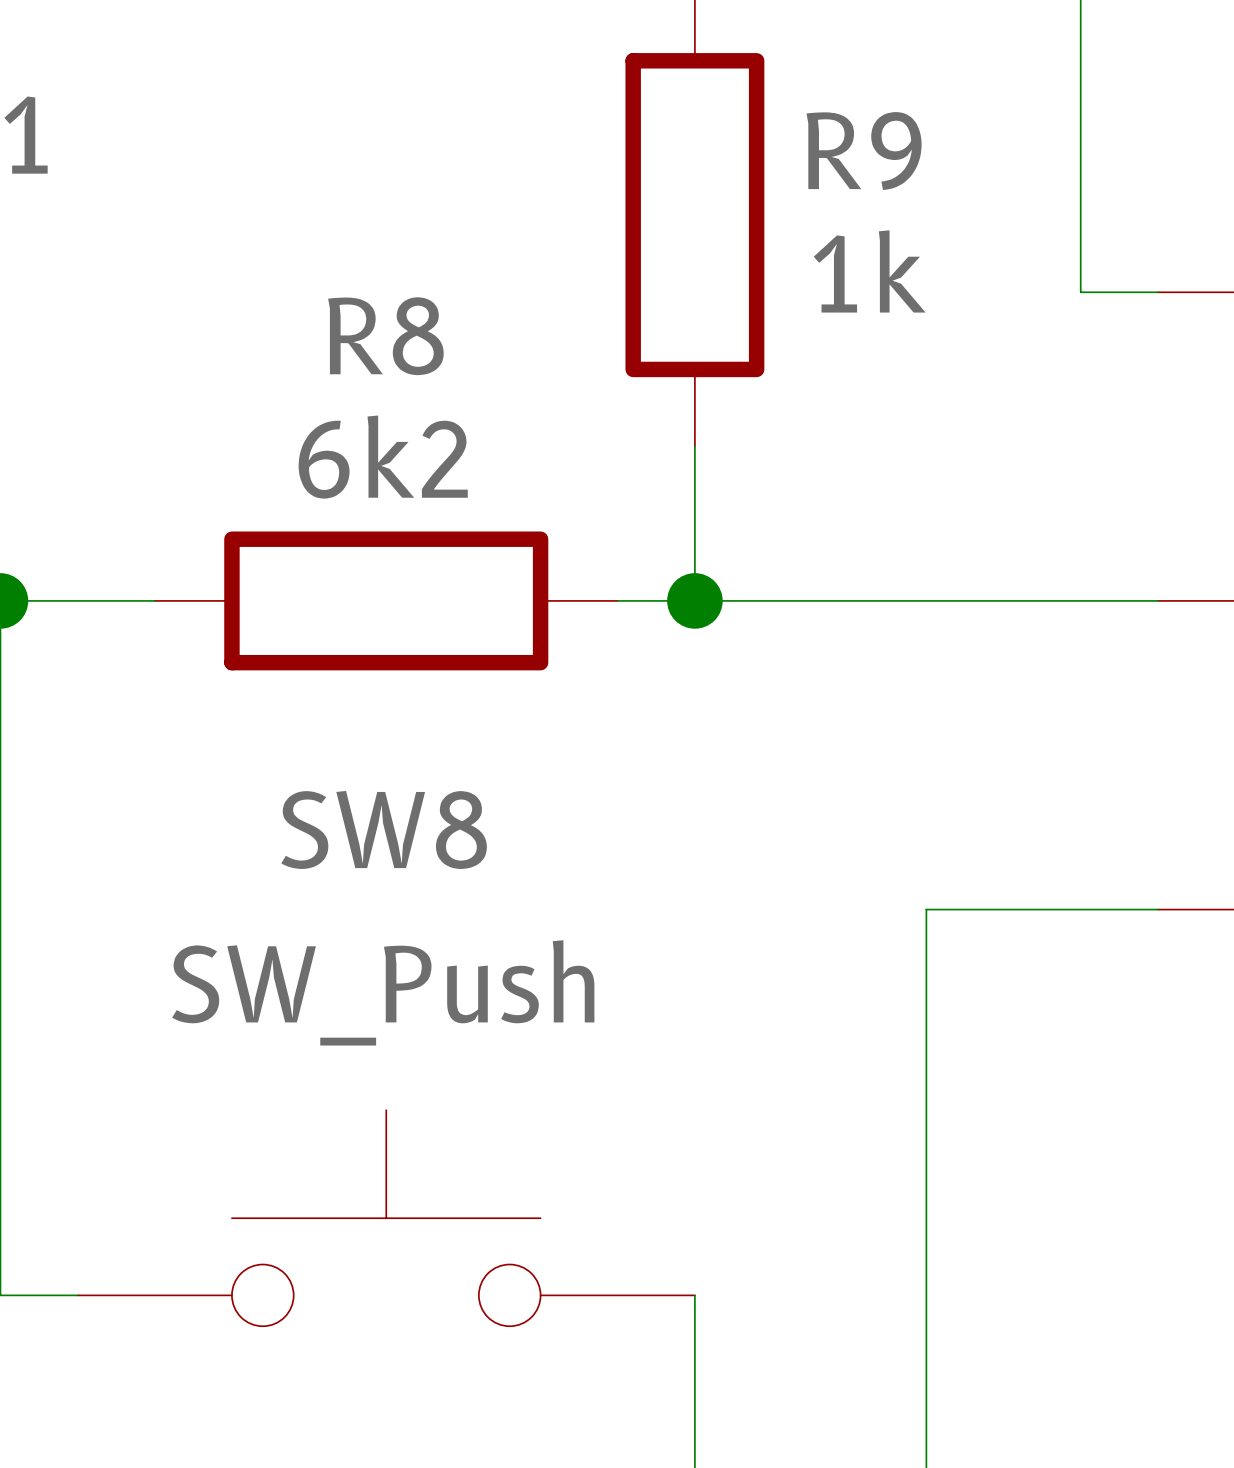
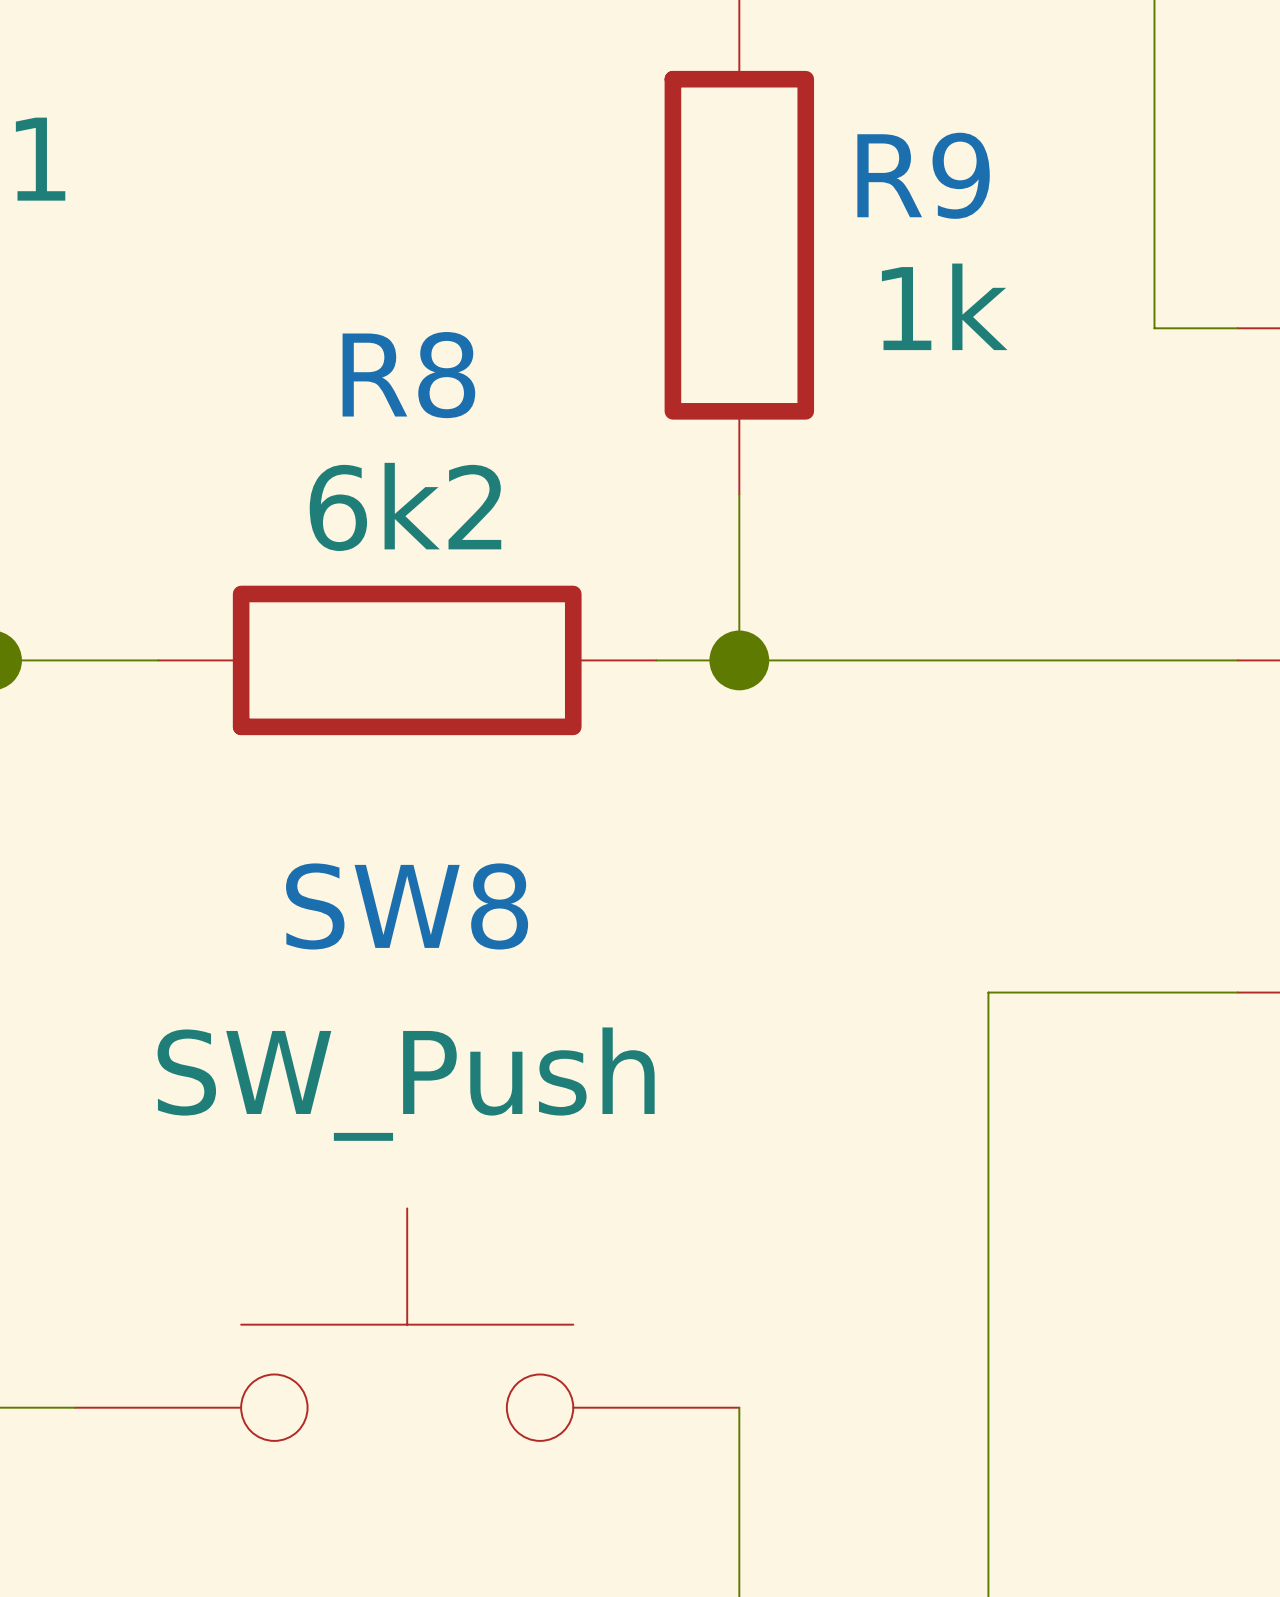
R9 value position: 1k (869, 271) -> 1k (944, 306)

